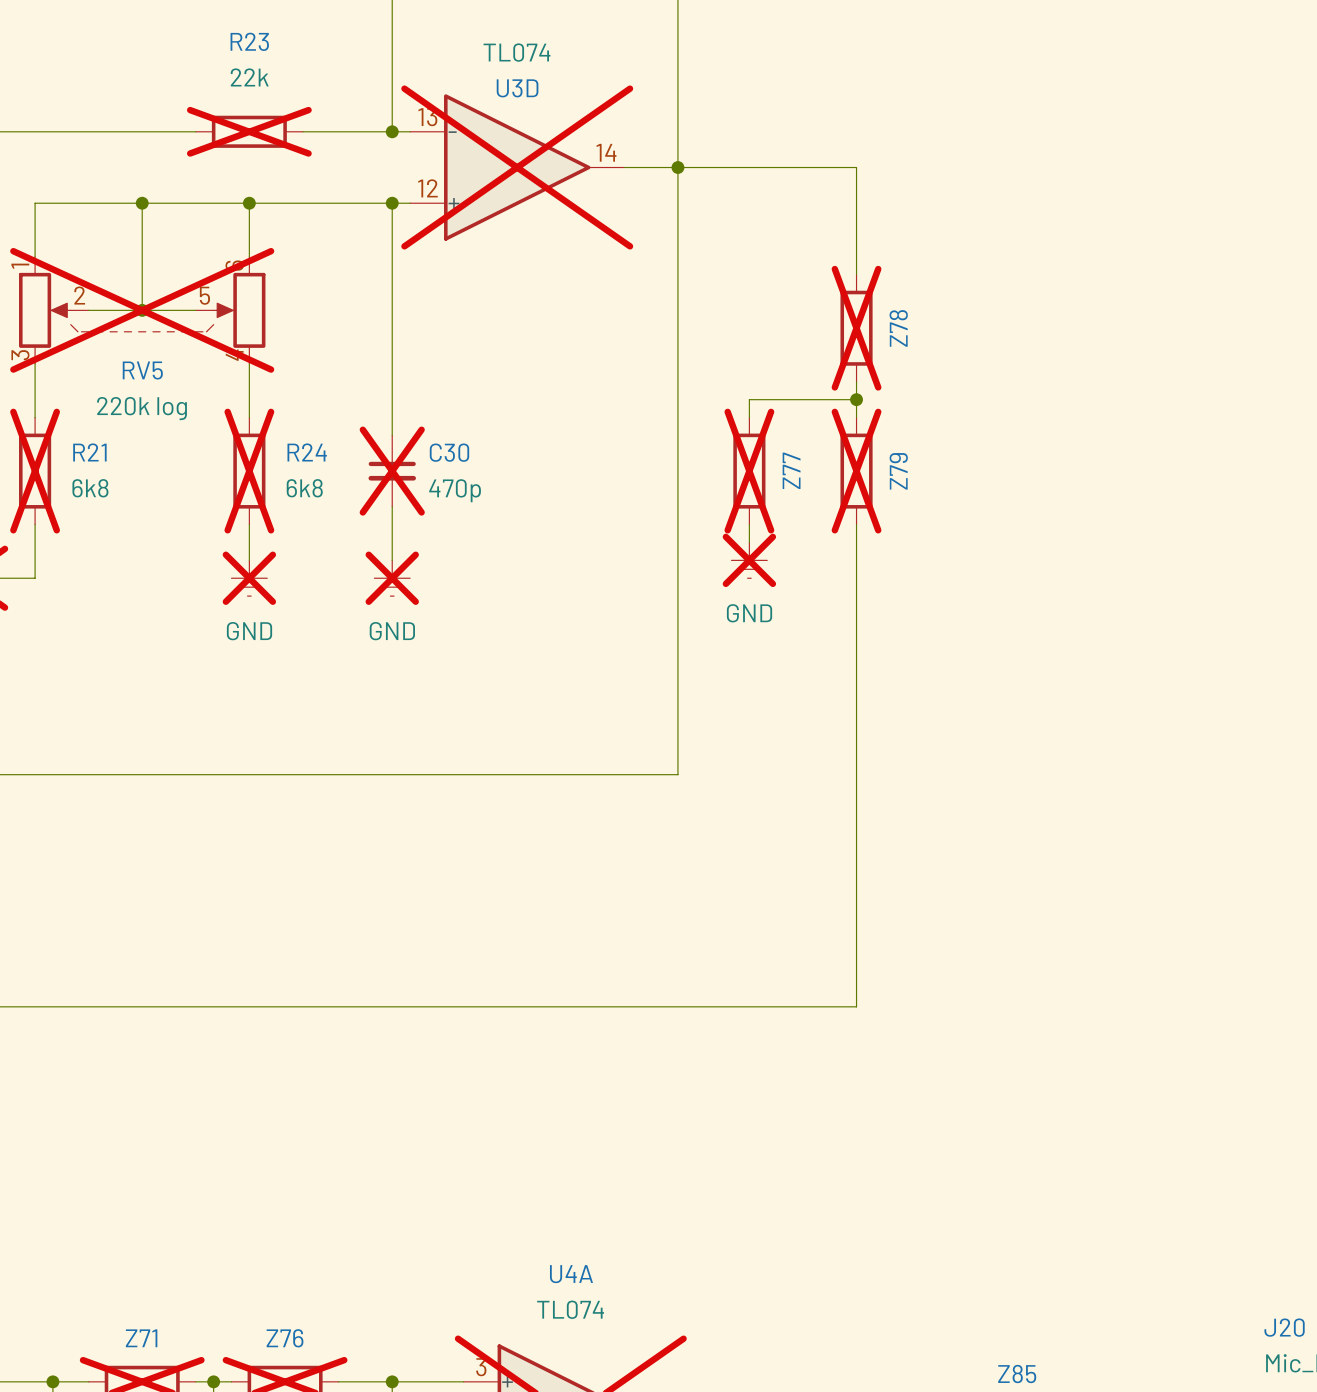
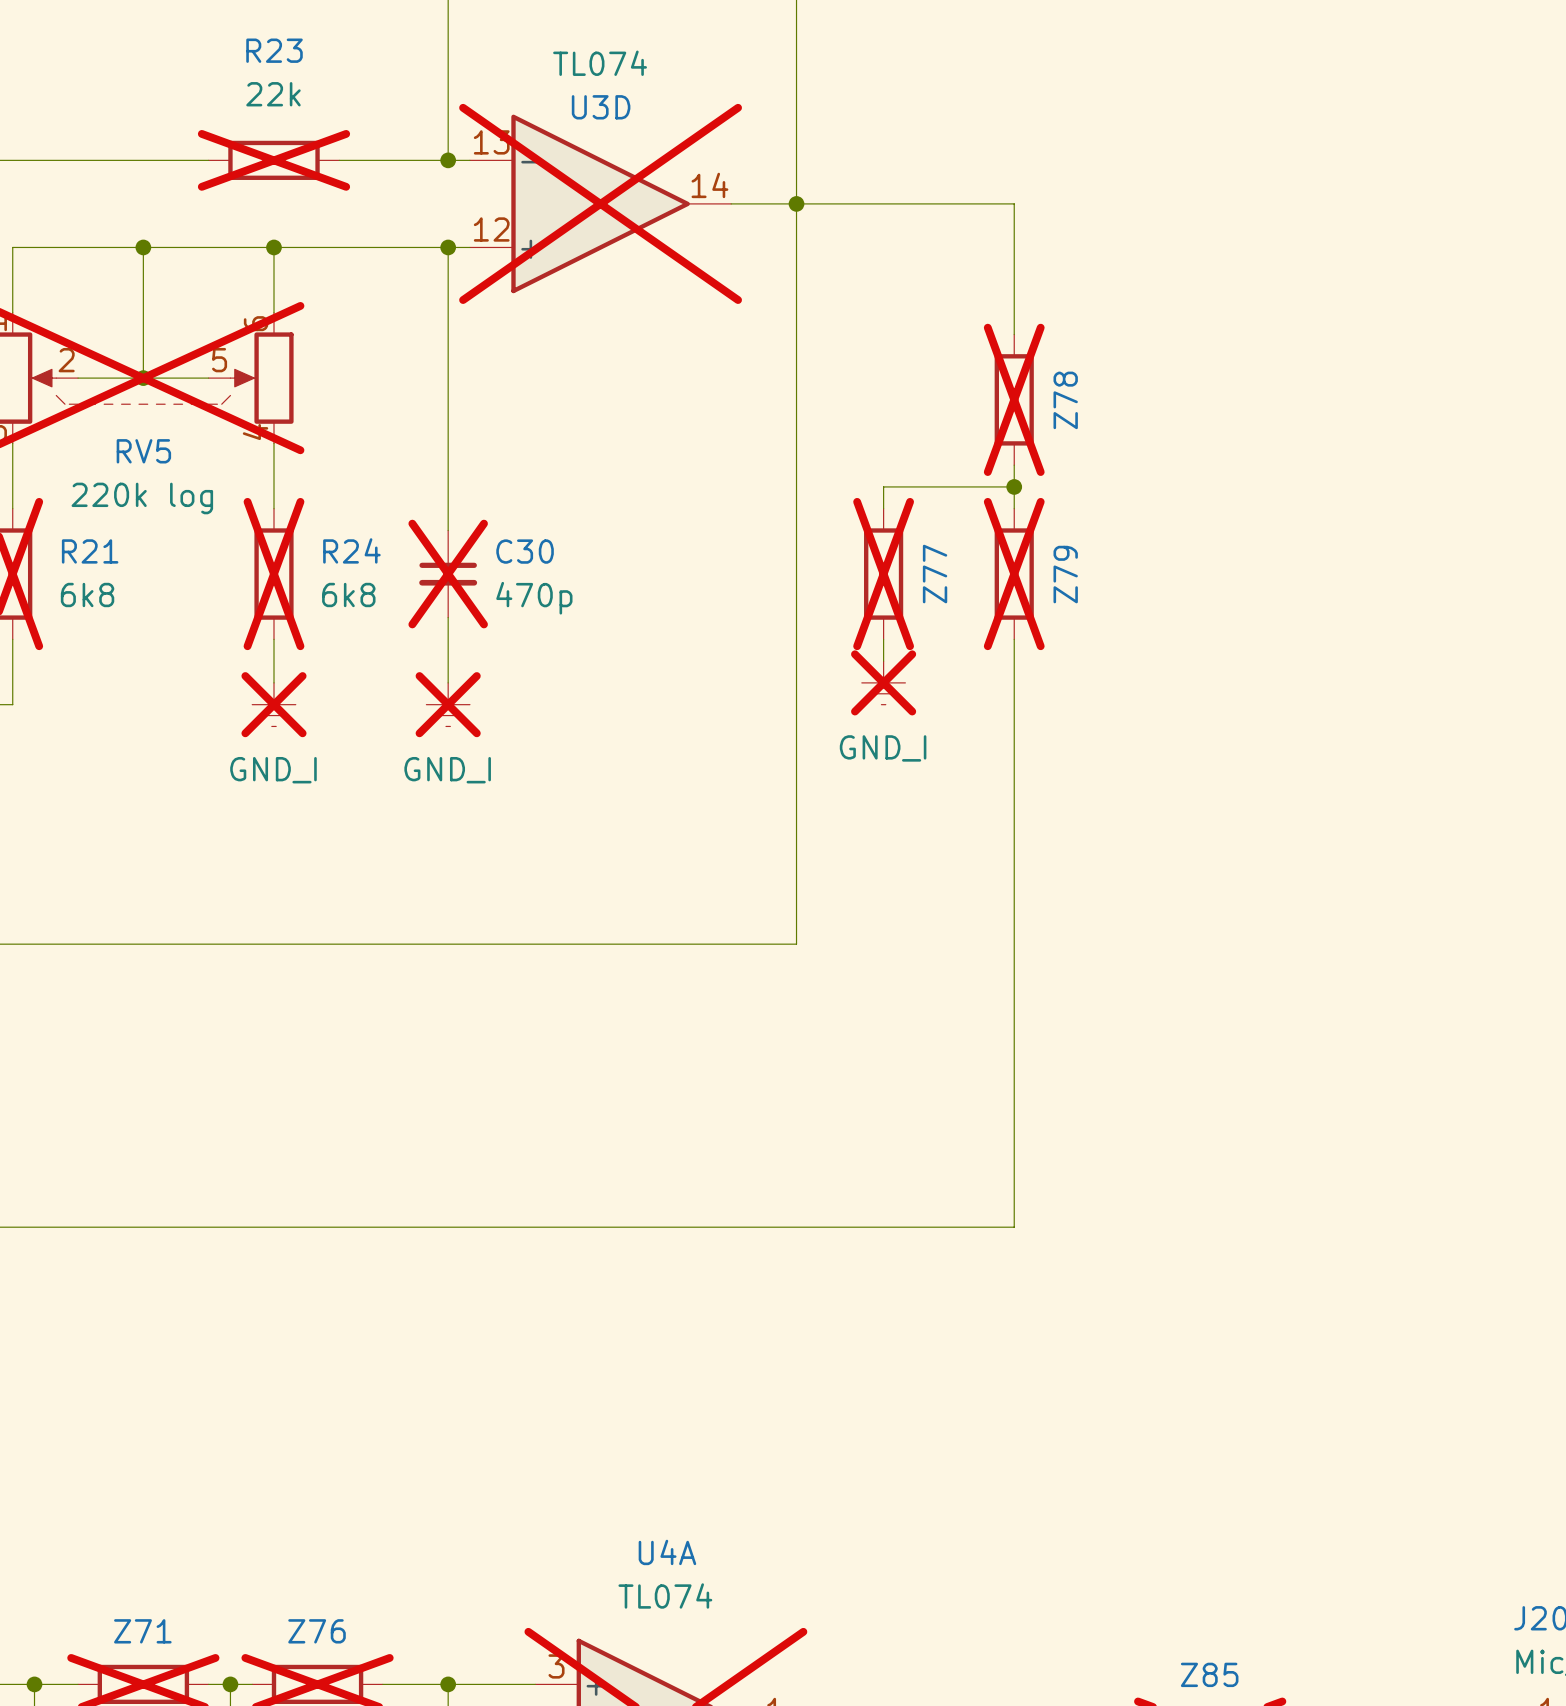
power symbol: GND (749, 560) -> GND_I (883, 682)
power symbol: GND (249, 578) -> GND_I (273, 704)
power symbol: GND (392, 578) -> GND_I (448, 704)

